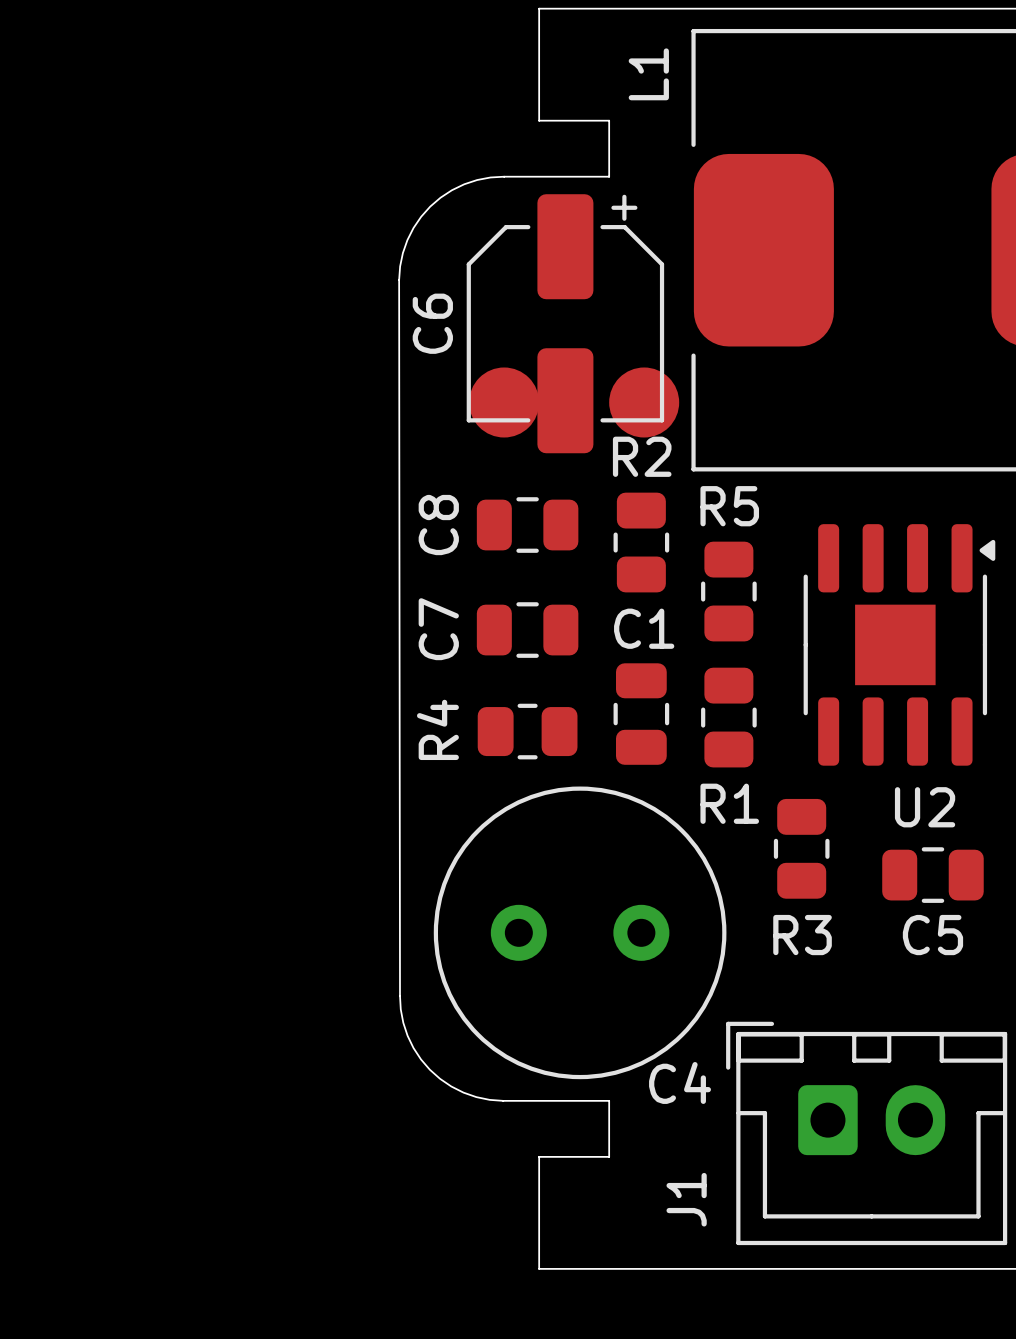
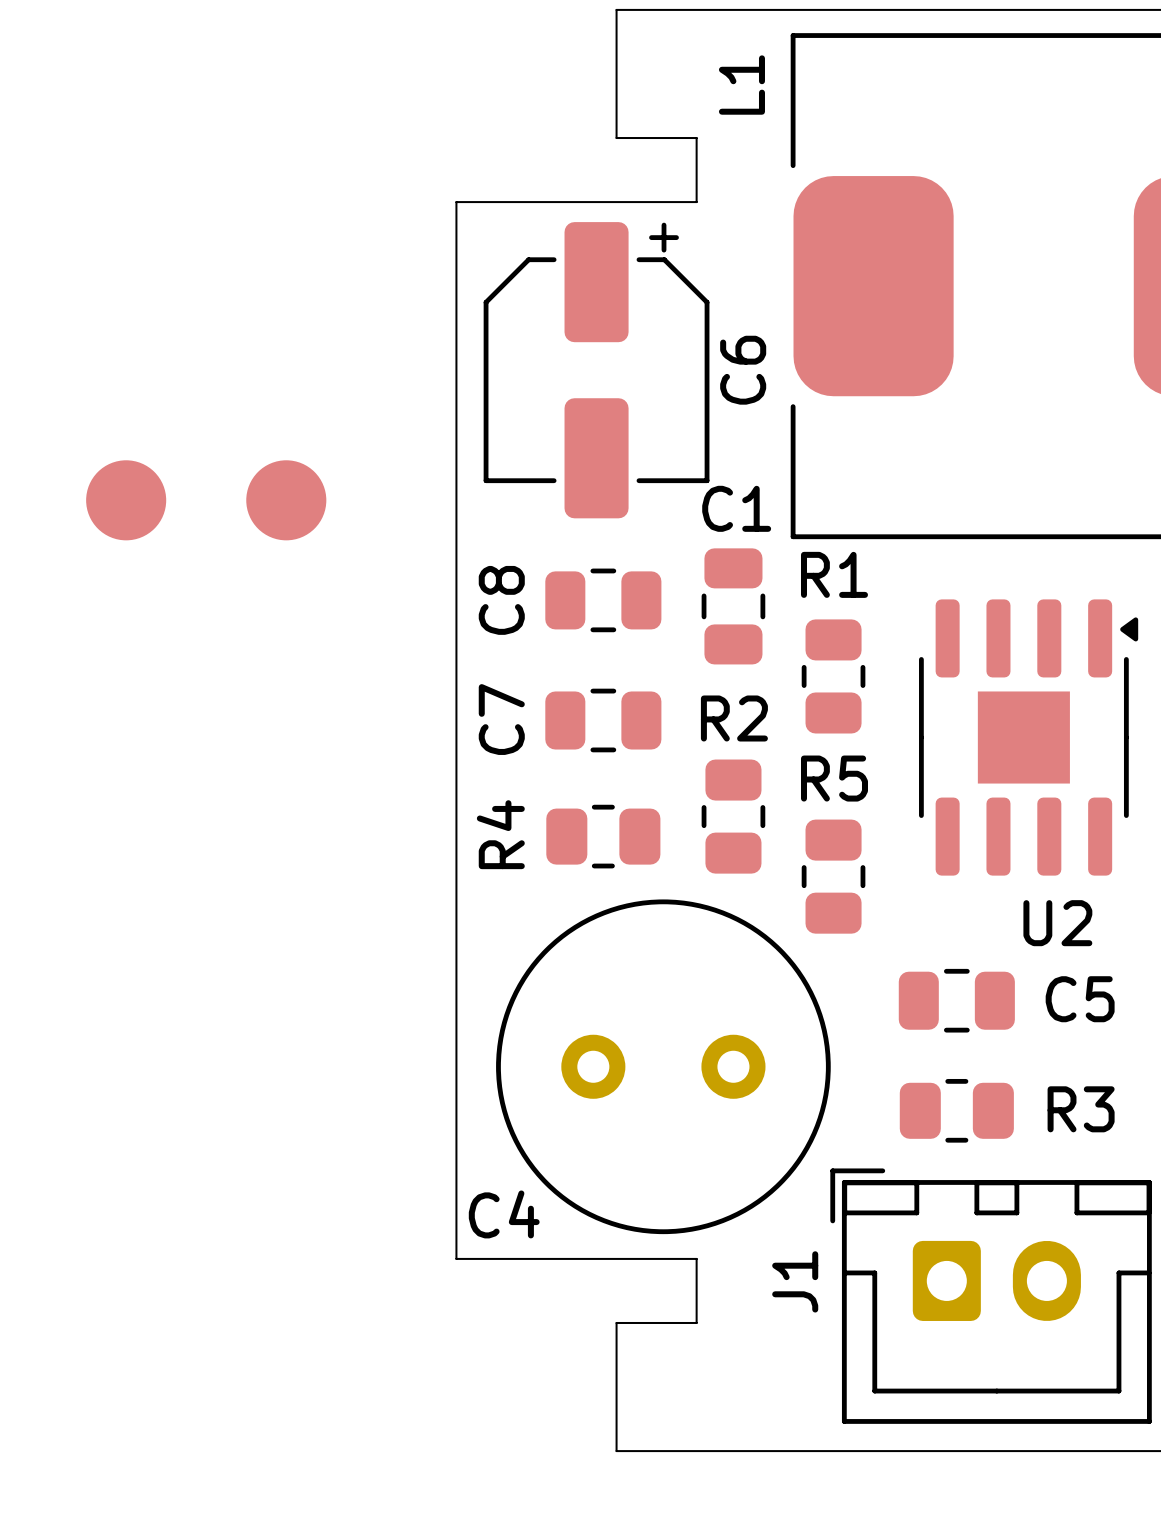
board edge: (504, 176) (477, 180) (464, 184) (440, 197) (430, 206) (421, 216) (407, 240) (402, 253) (399, 279) (400, 1009) (403, 1022) (413, 1048) (420, 1059) (440, 1078) (451, 1086) (476, 1097) (503, 1100) -> (576, 202) (456, 202) (456, 1258) (575, 1258)
C6 name position: C6 (432, 323) -> C6 (743, 370)
C6 position: (565, 323) -> (596, 370)
part position: (574, 402) -> (206, 500)
R5 name: R5 (729, 506) -> R1 (834, 574)
R2 position: (641, 542) -> (733, 816)
C1 position: (641, 714) -> (733, 606)
R1: (728, 717) -> none
R5: none -> (833, 876)
R3 rotation: 0° (801, 848) -> 90° clockwise (956, 1110)
R3 position: (801, 848) -> (956, 1110)
C5 position: (932, 875) -> (956, 1000)
R3 name position: R3 (802, 935) -> R3 (1081, 1109)
C5 name position: C5 (932, 935) -> C5 (1080, 999)
C4 name position: C4 (680, 1082) -> C4 (504, 1214)
J1 name position: J1 (686, 1199) -> J1 (795, 1281)

